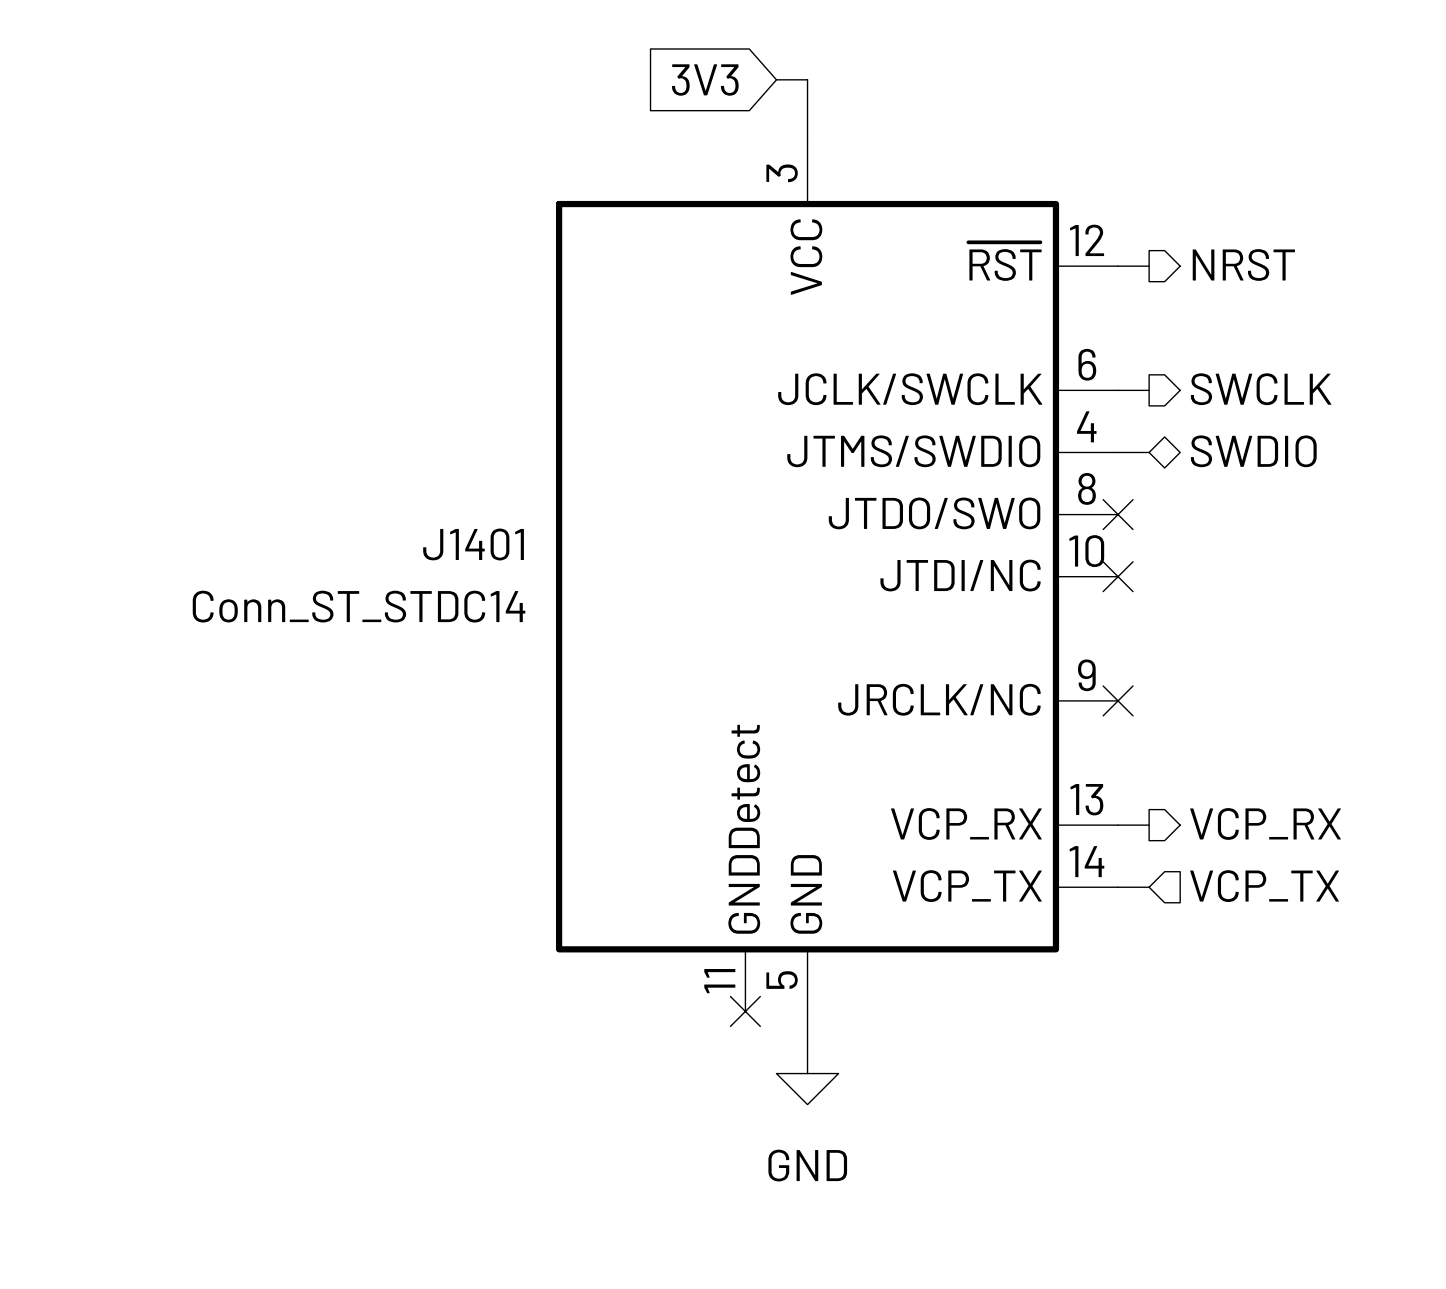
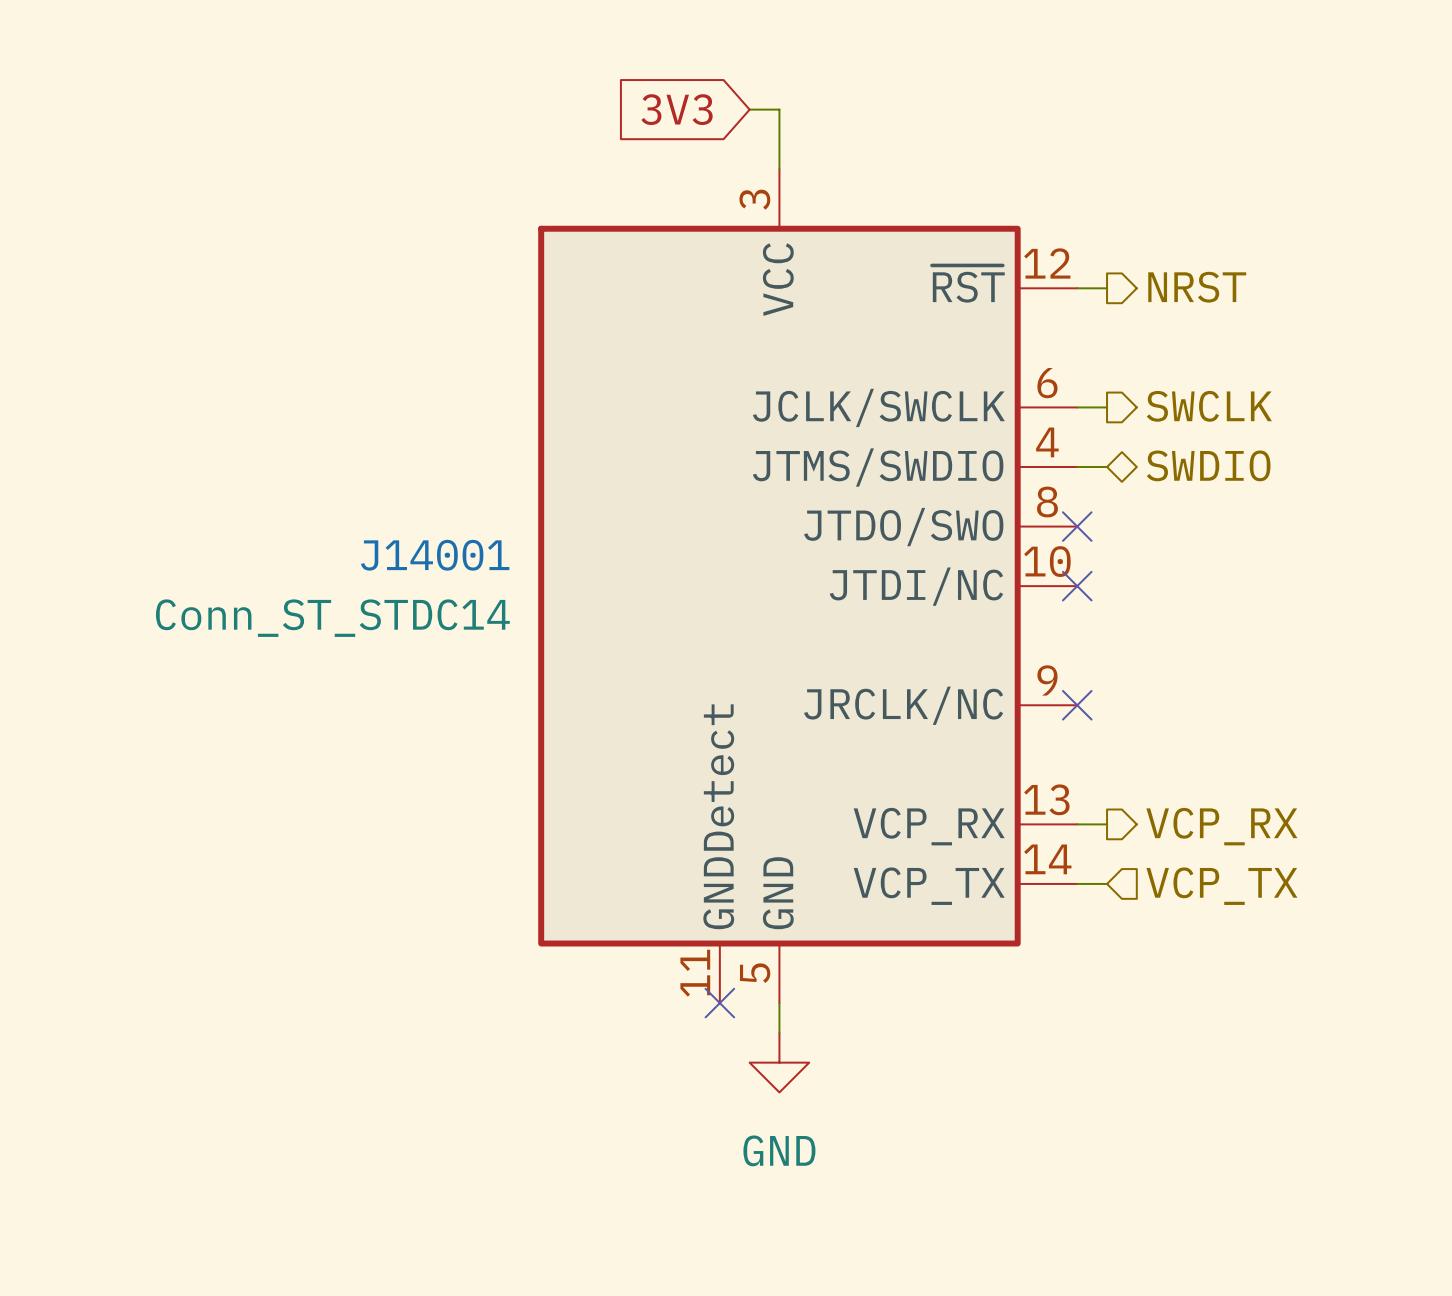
J1401 name: J1401 (473, 544) -> J14001 (435, 555)

